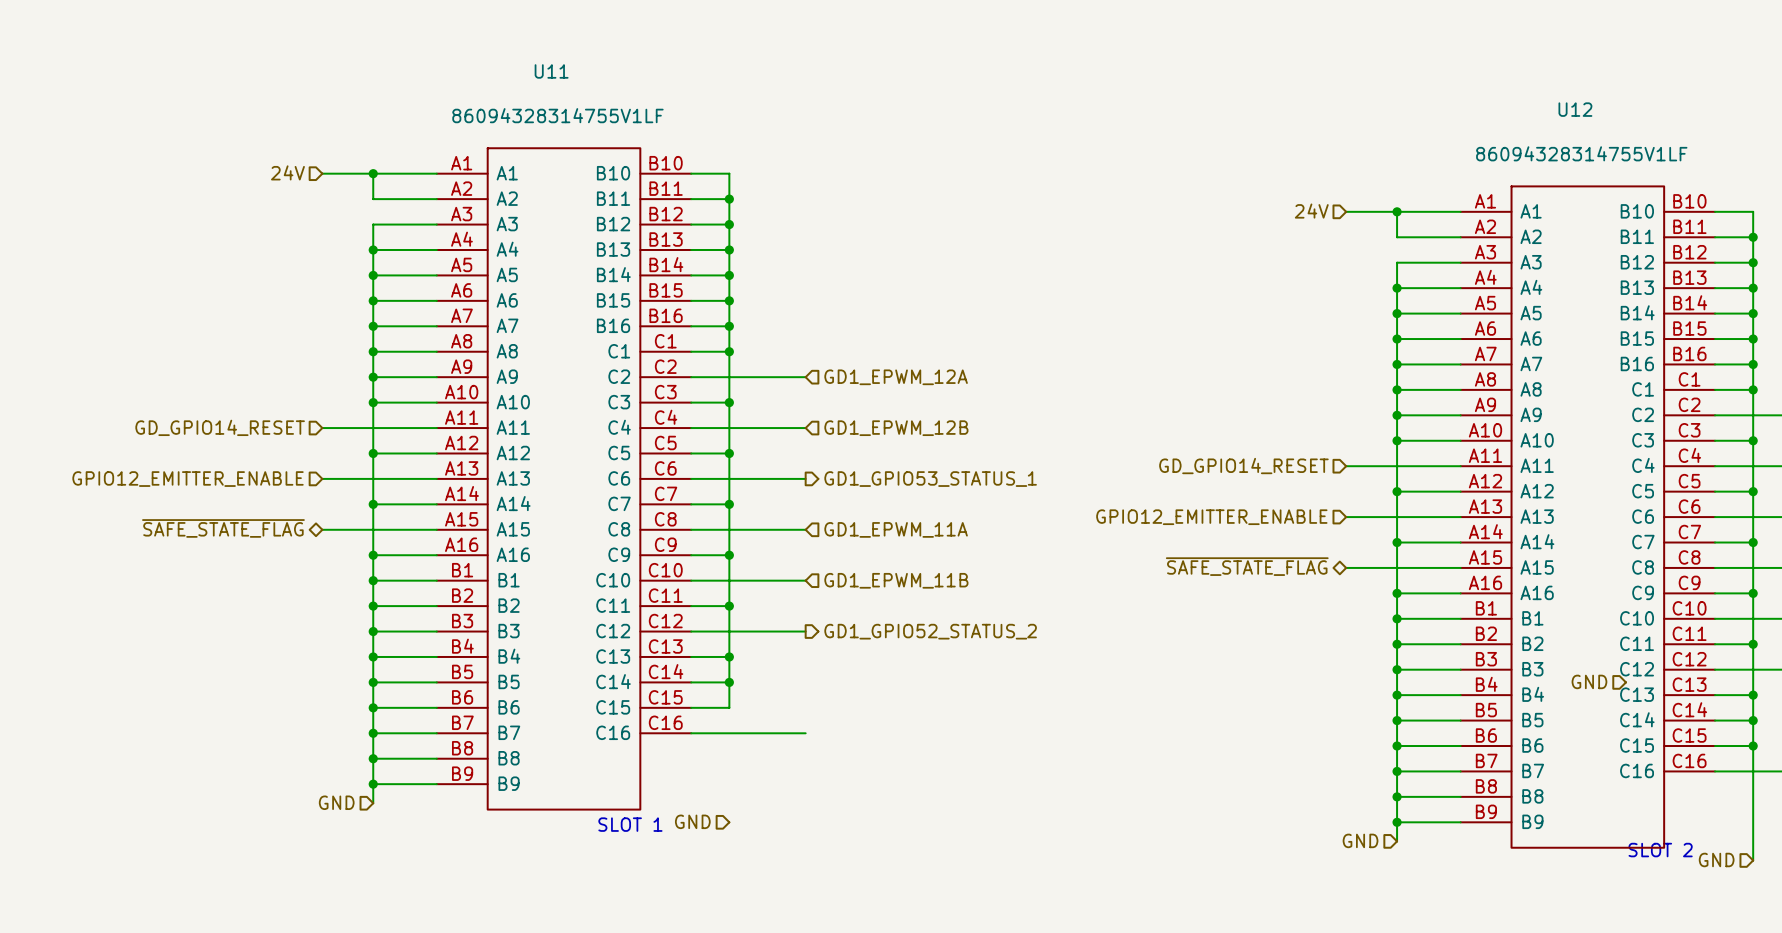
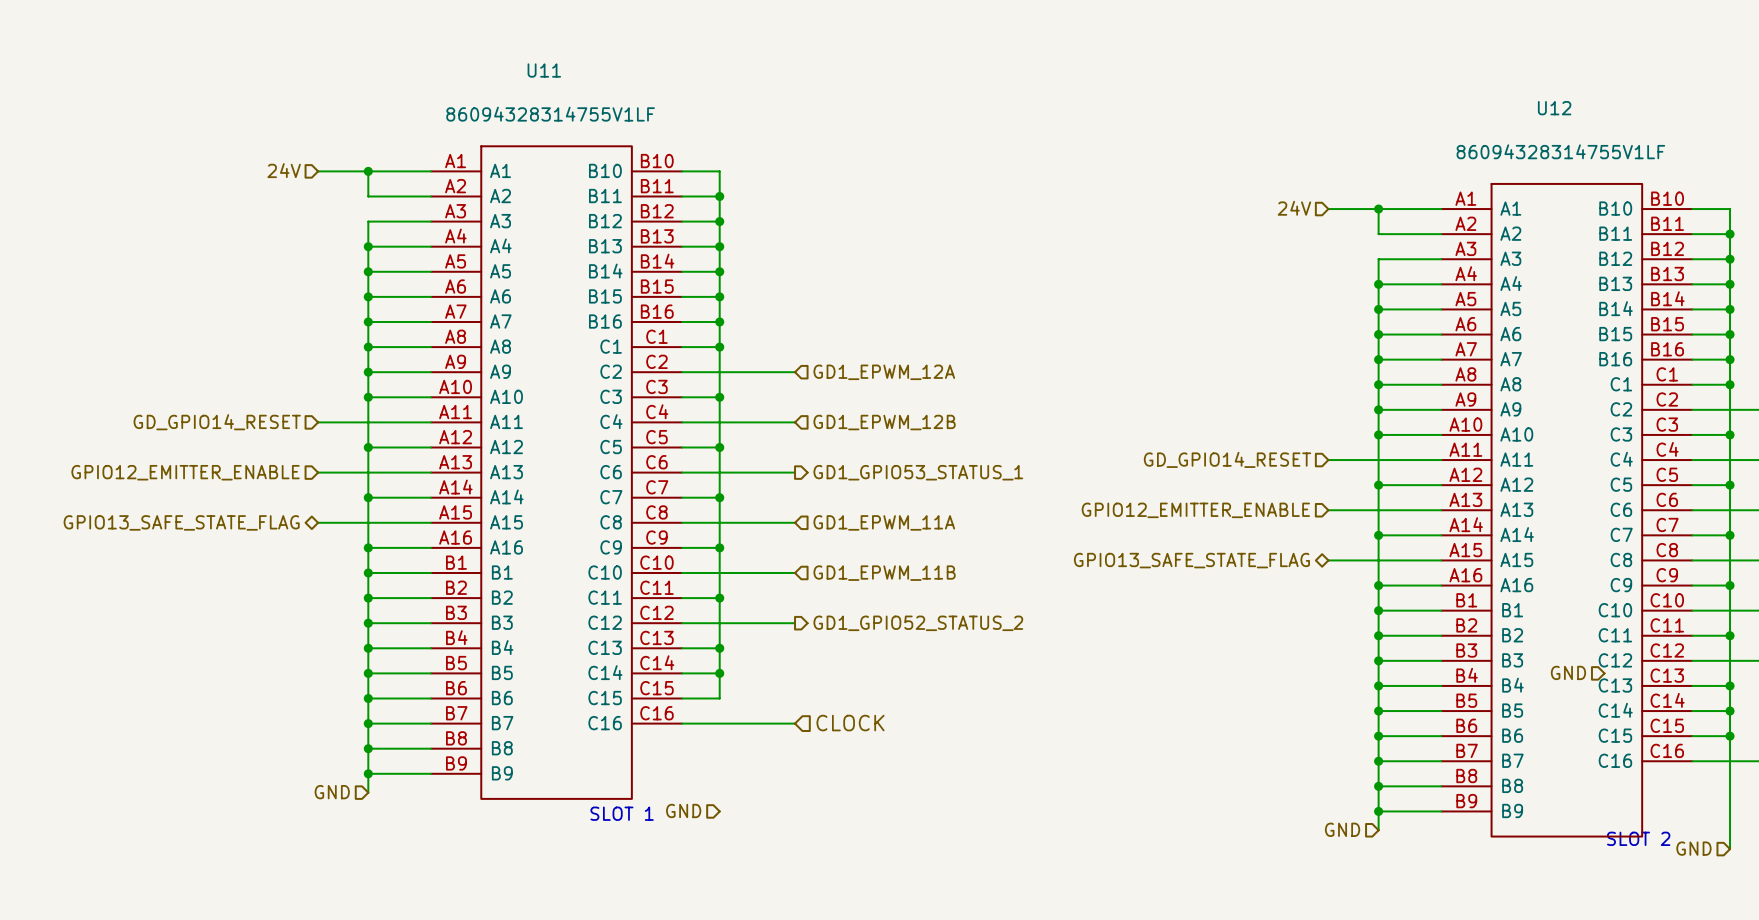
hierarchical label: ~{SAFE_STATE_FLAG} (223, 528) -> GPIO13_SAFE_STATE_FLAG (181, 522)
hierarchical label: ~{SAFE_STATE_FLAG} (1247, 566) -> GPIO13_SAFE_STATE_FLAG (1191, 560)
hierarchical label: none -> CLOCK (850, 723)

